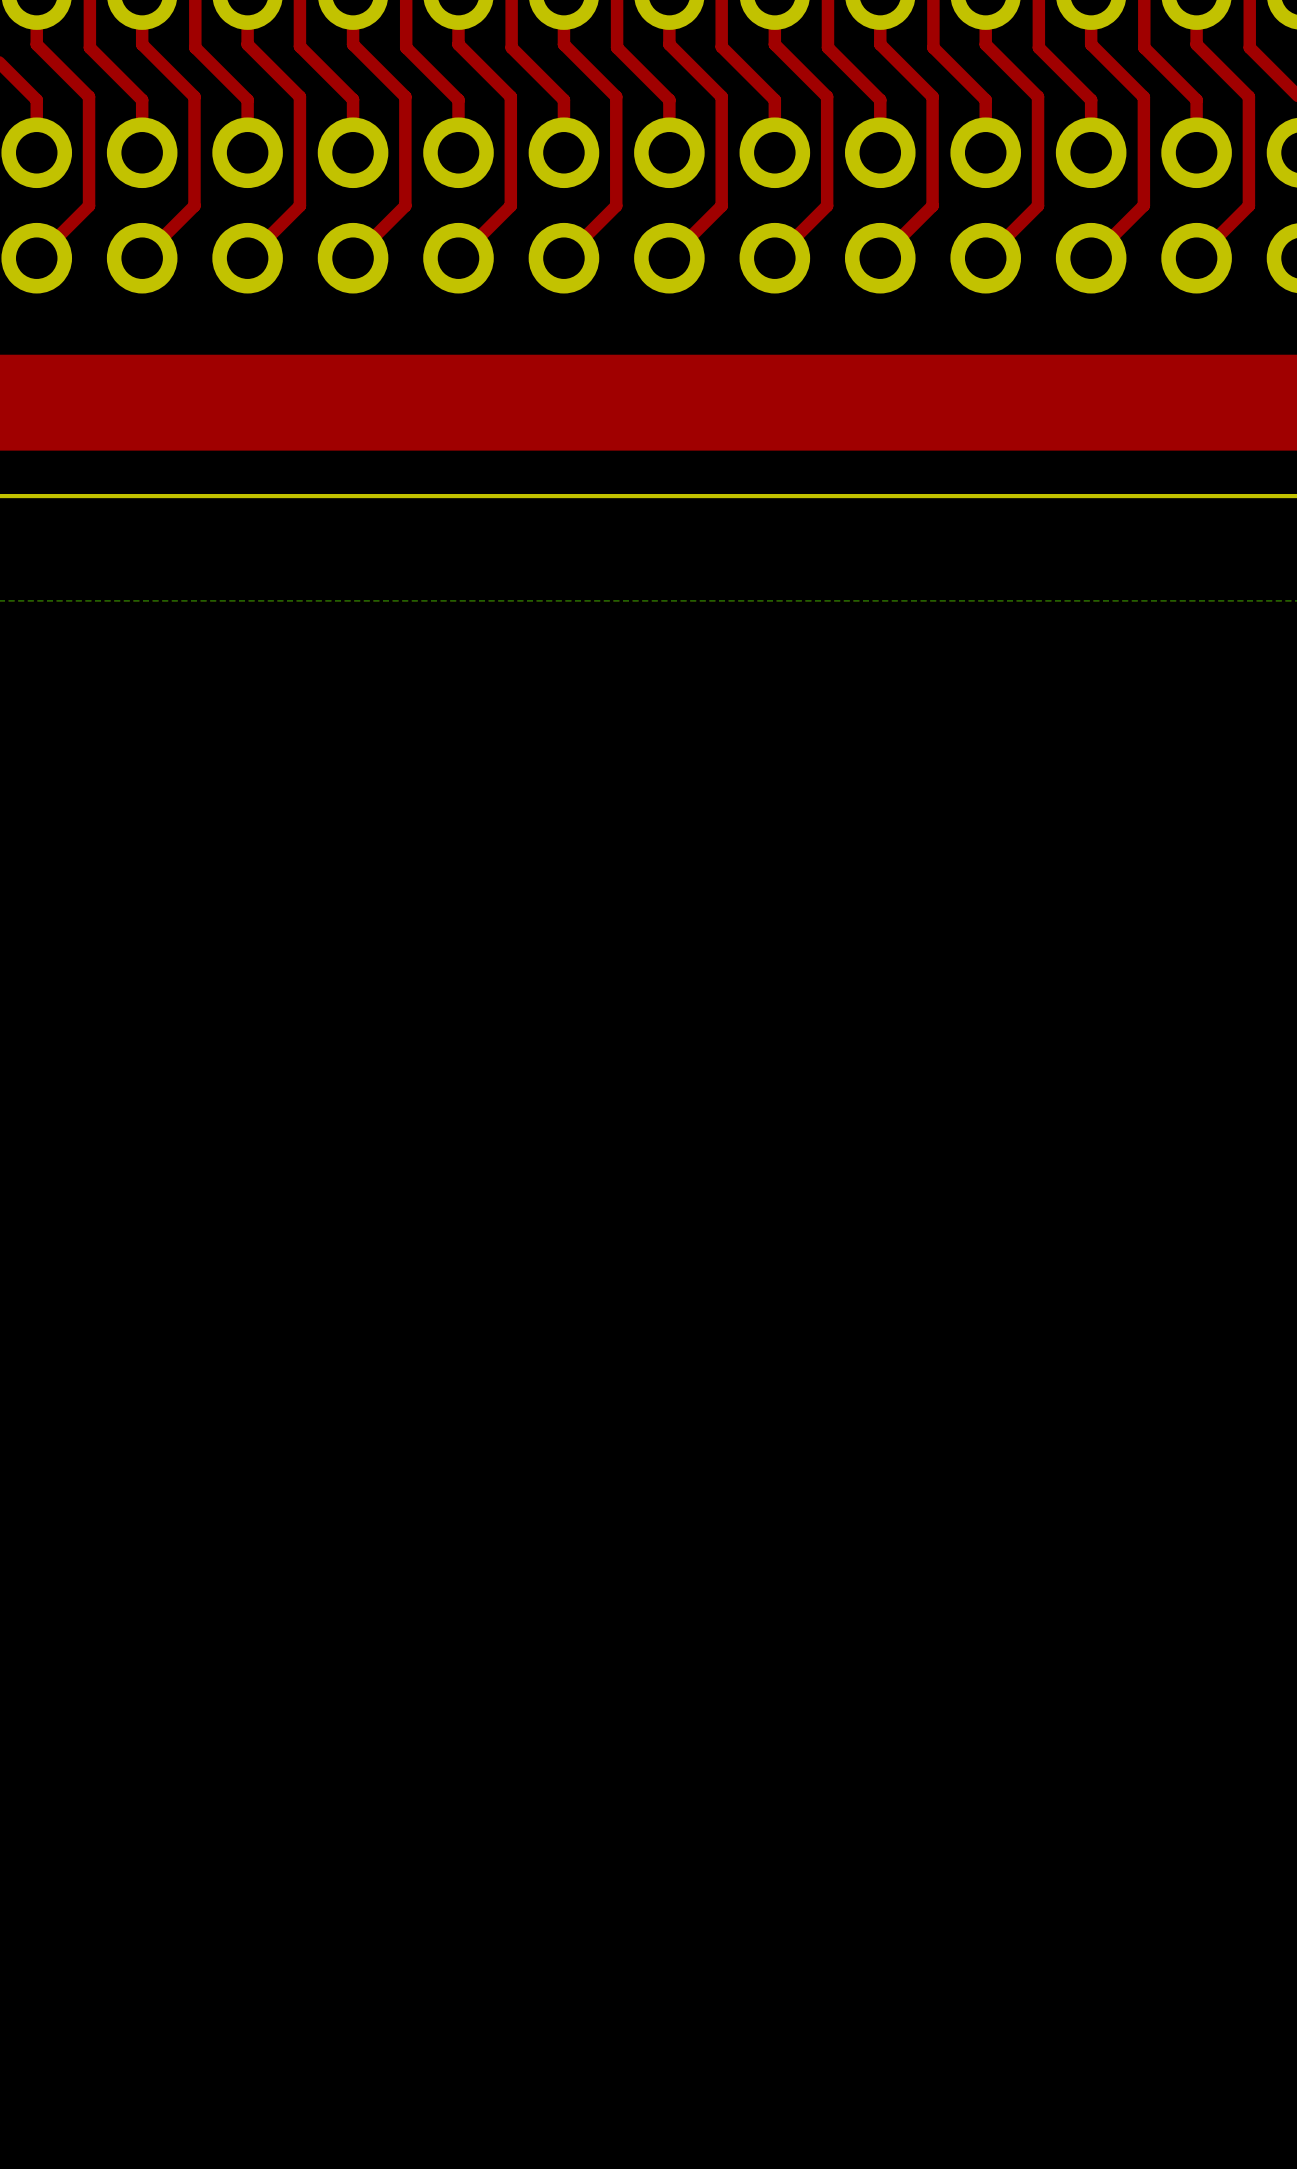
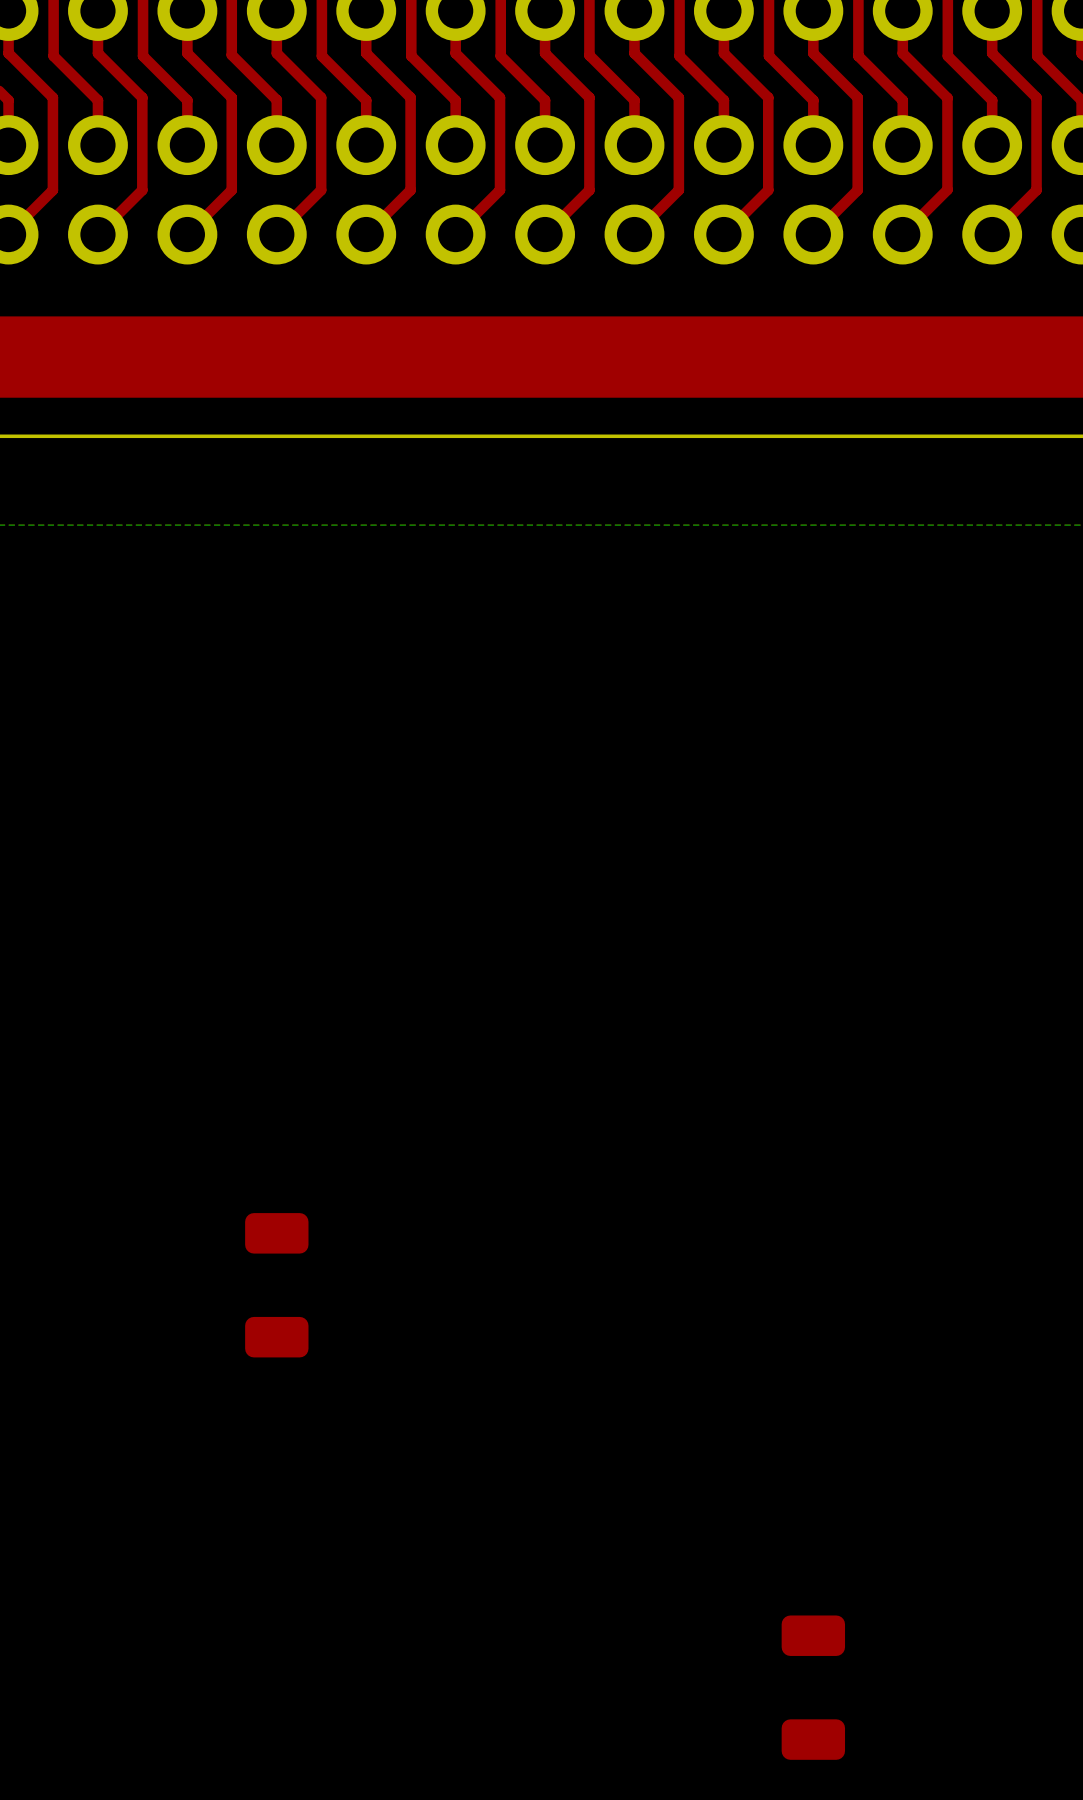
part: none -> (276, 1285)
part: none -> (813, 1687)

